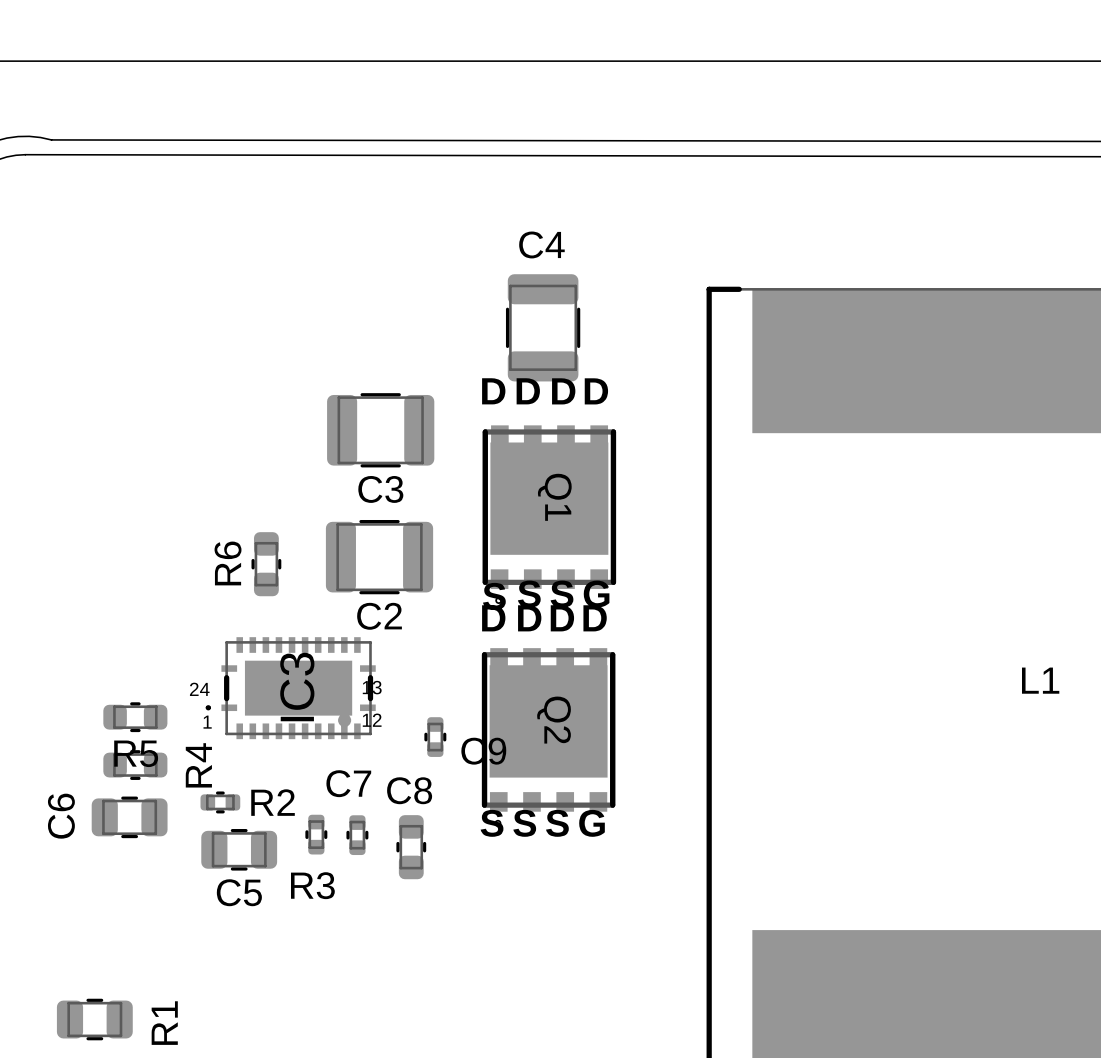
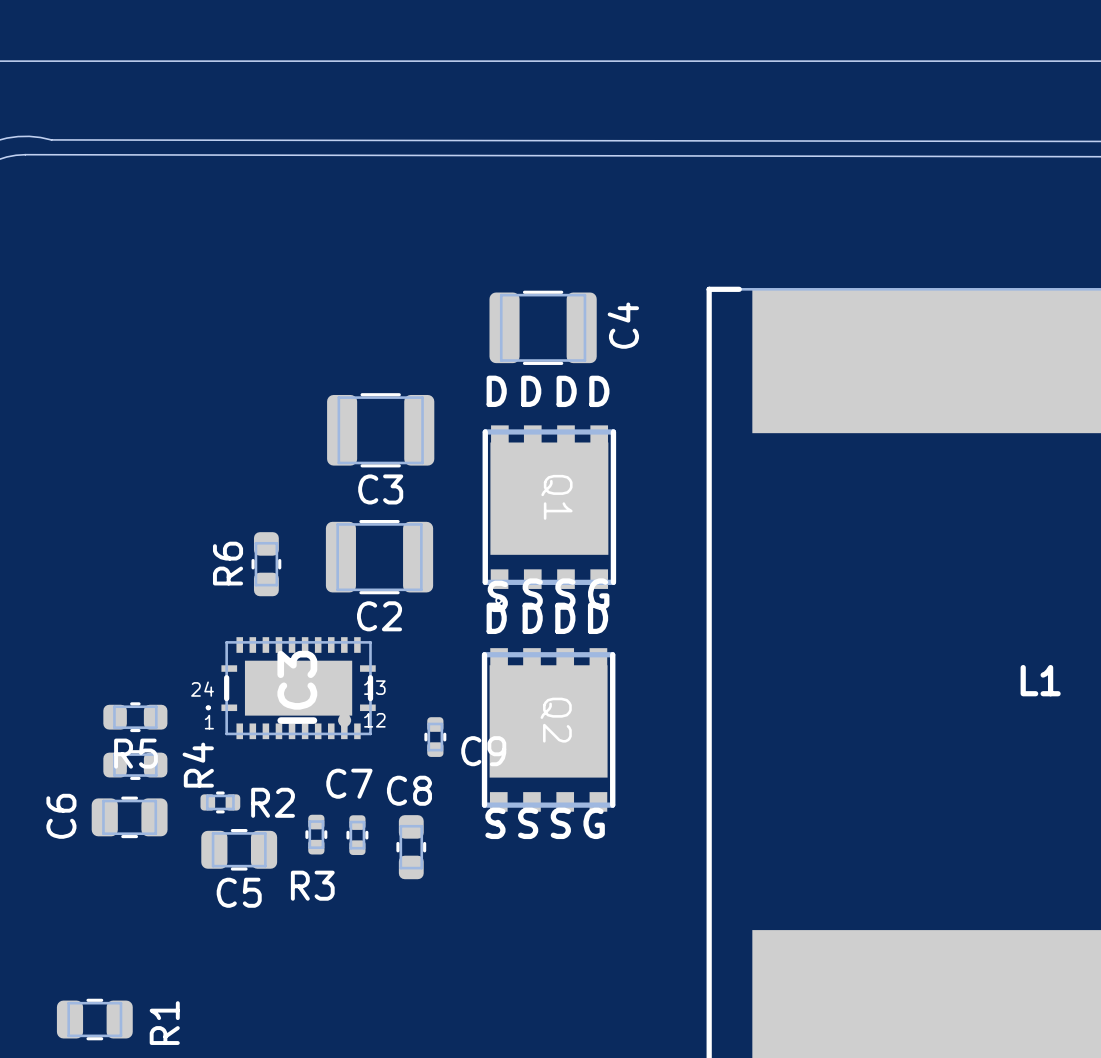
C4 rotation: 0° (543, 327) -> 90° clockwise (543, 327)

